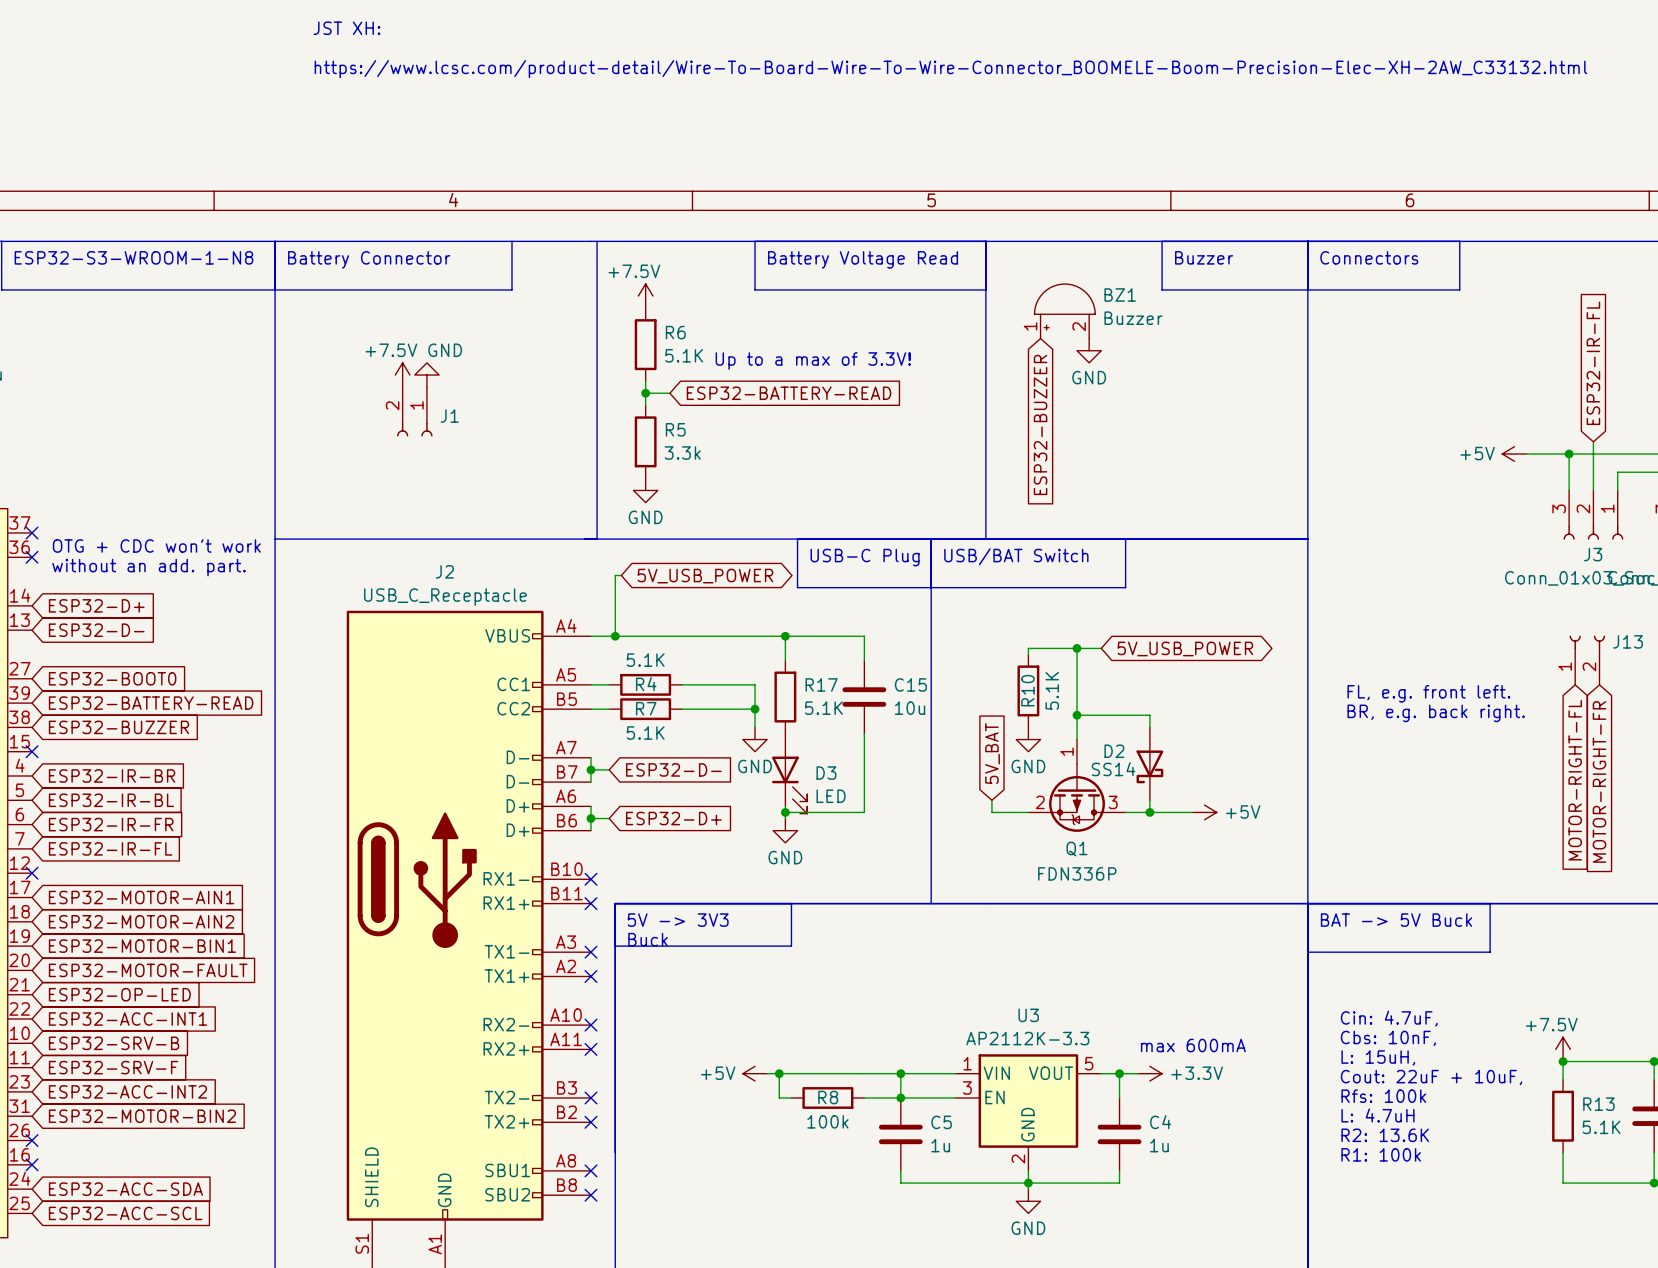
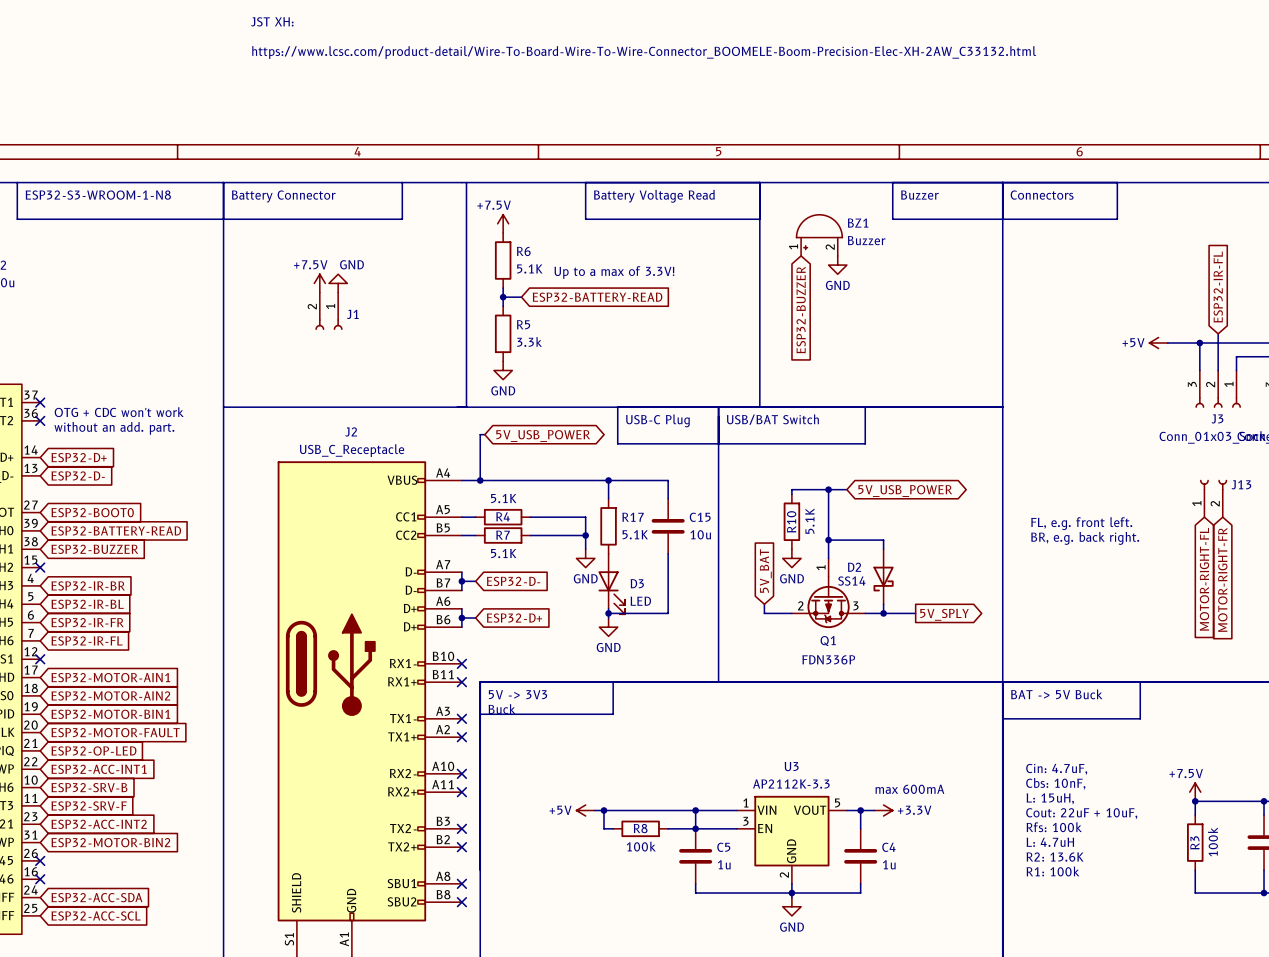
power symbol: +5V (1204, 812) -> none
global label: none -> 5V_SPLY (944, 614)
R13 name: R13 (1598, 1104) -> R3 (1194, 842)
R13 value: 5.1K (1601, 1127) -> 100k (1212, 842)

